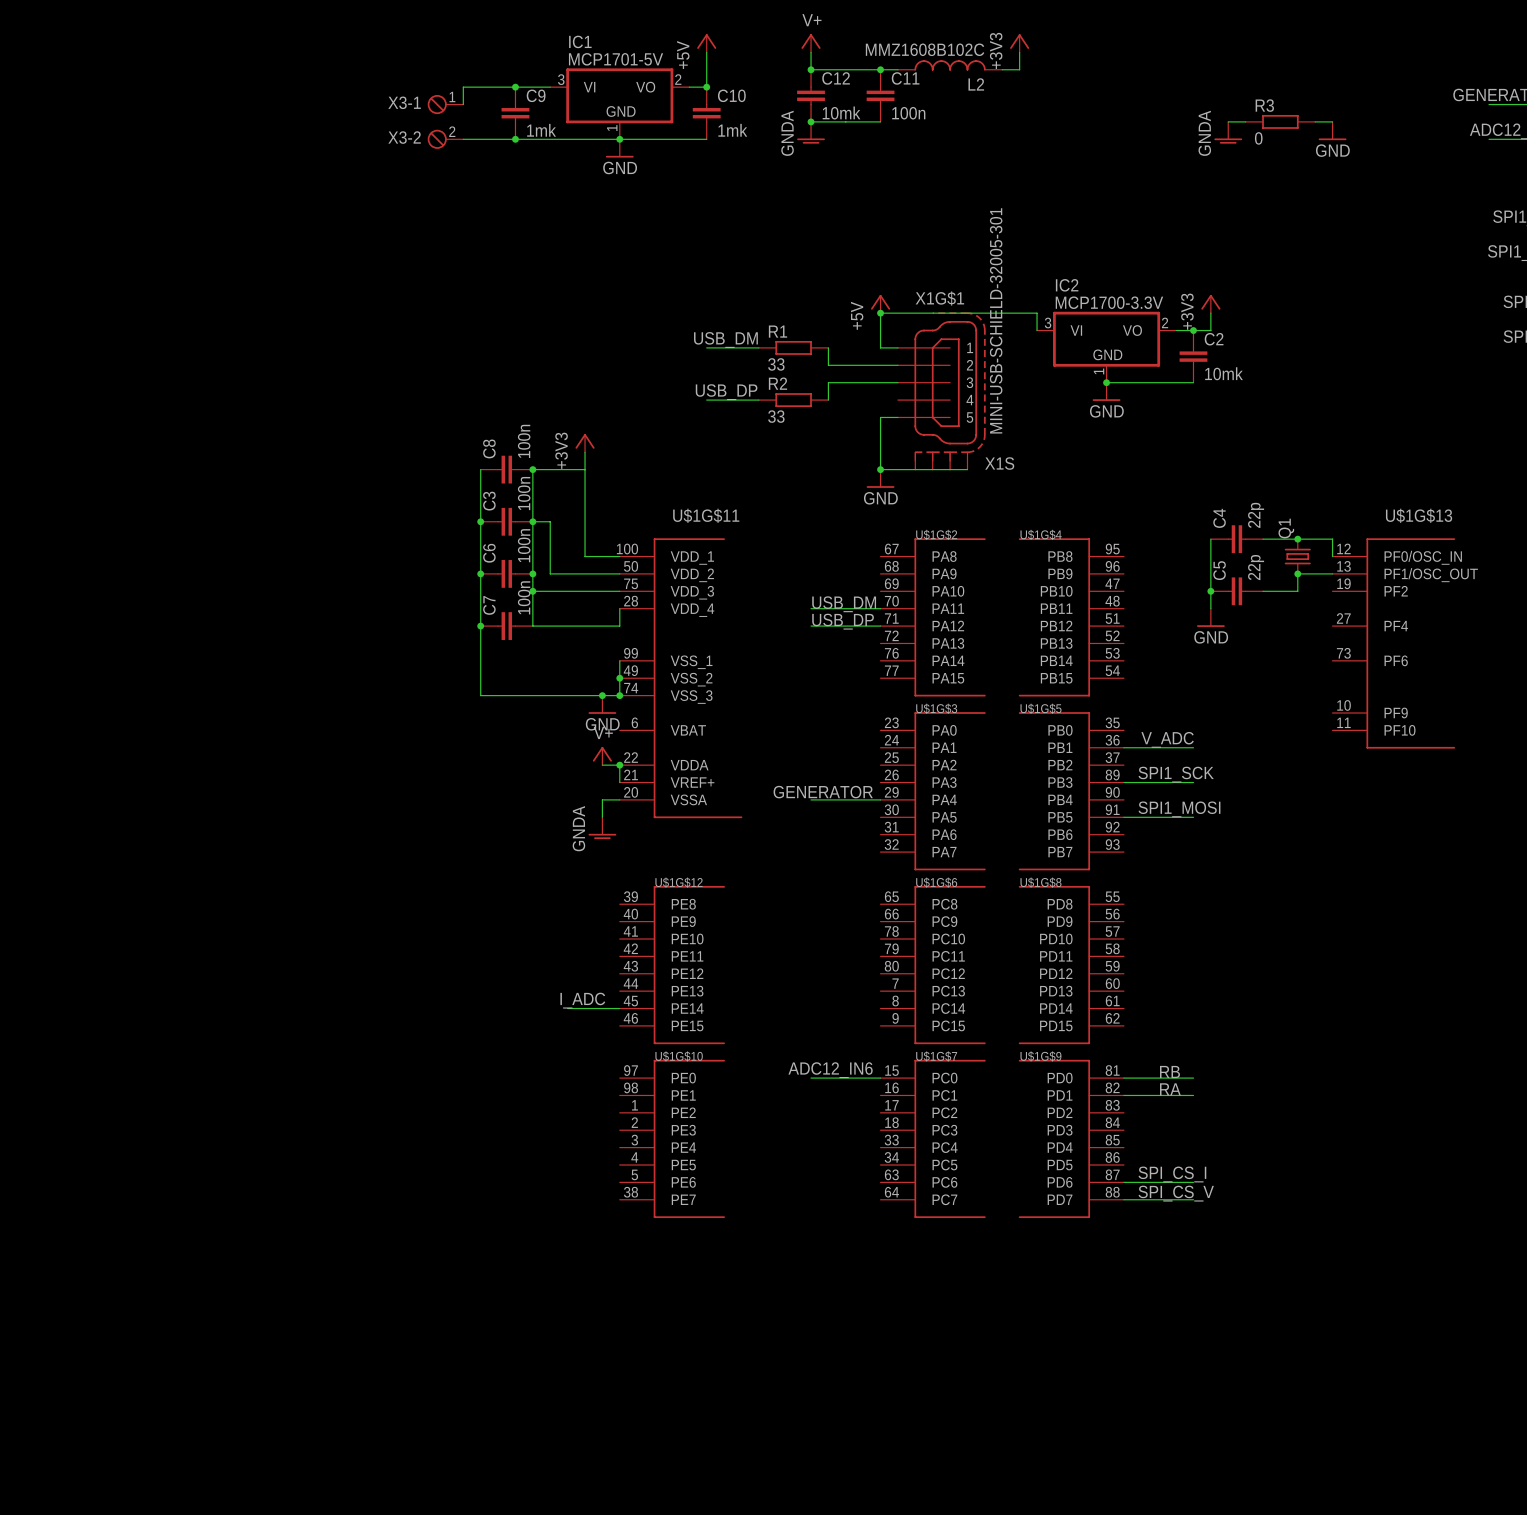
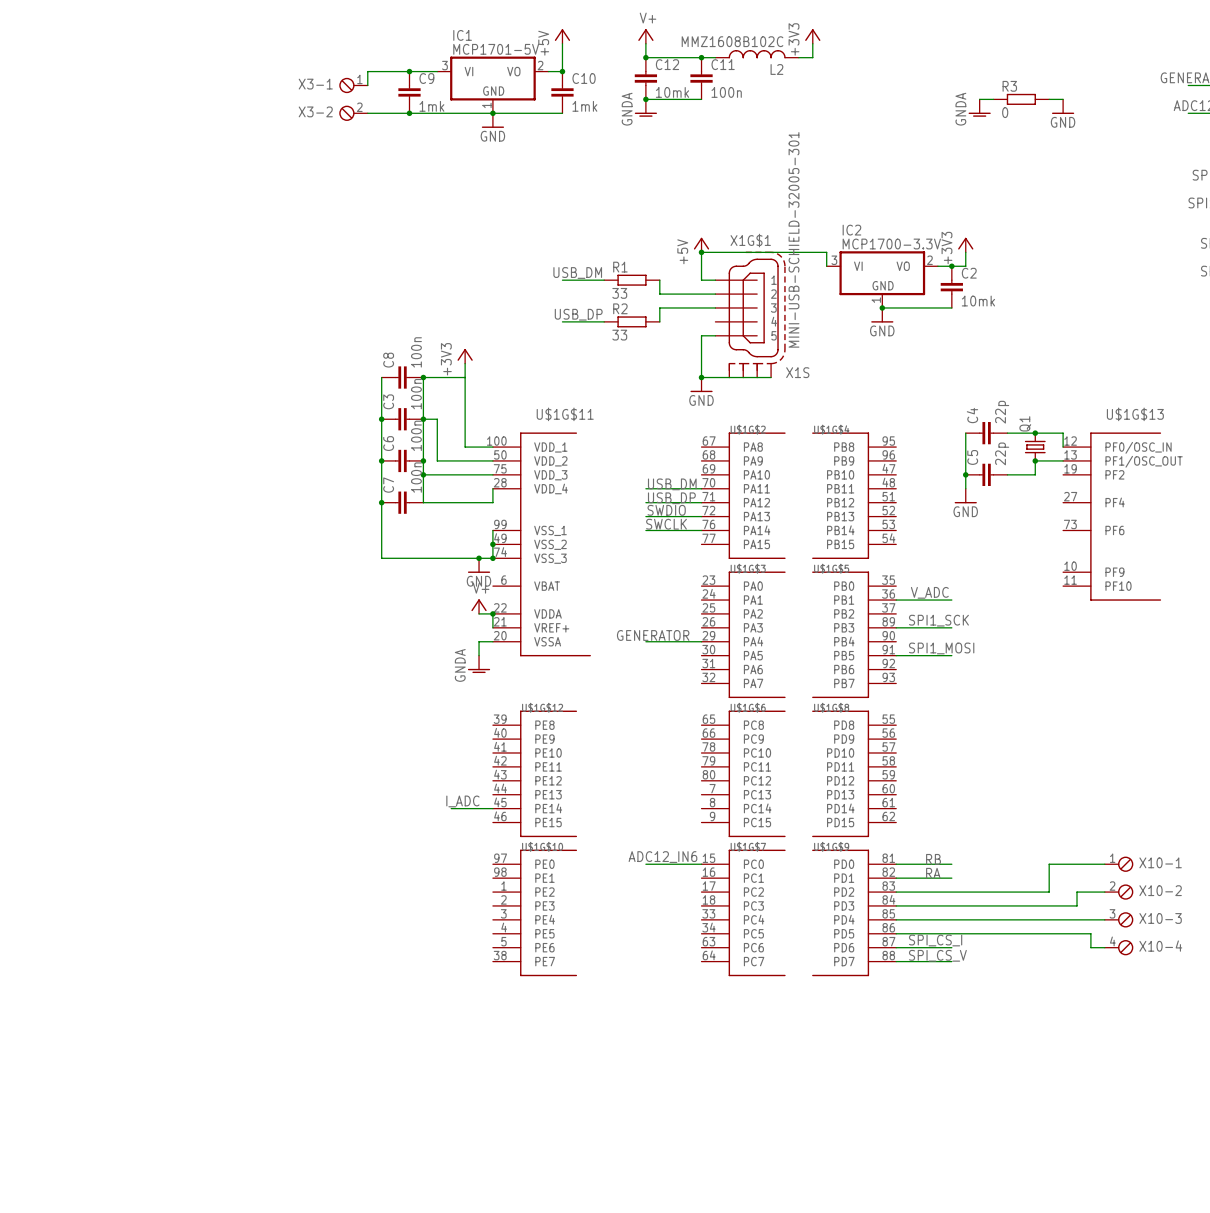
label: none -> SWDIO (666, 510)
wire: none -> (645, 516) (701, 516)
label: none -> SWCLK (666, 524)
wire: none -> (645, 530) (701, 530)
wire: none -> (1104, 864) (1049, 864) (1049, 892) (896, 892)
X10-1: none -> (1119, 864)
wire: none -> (1104, 892) (1077, 892) (1077, 905) (896, 905)
X10-2: none -> (1119, 892)
wire: none -> (896, 919) (1104, 919)
X10-3: none -> (1119, 919)
wire: none -> (896, 933) (1090, 933) (1090, 947) (1104, 947)
X10-4: none -> (1119, 947)

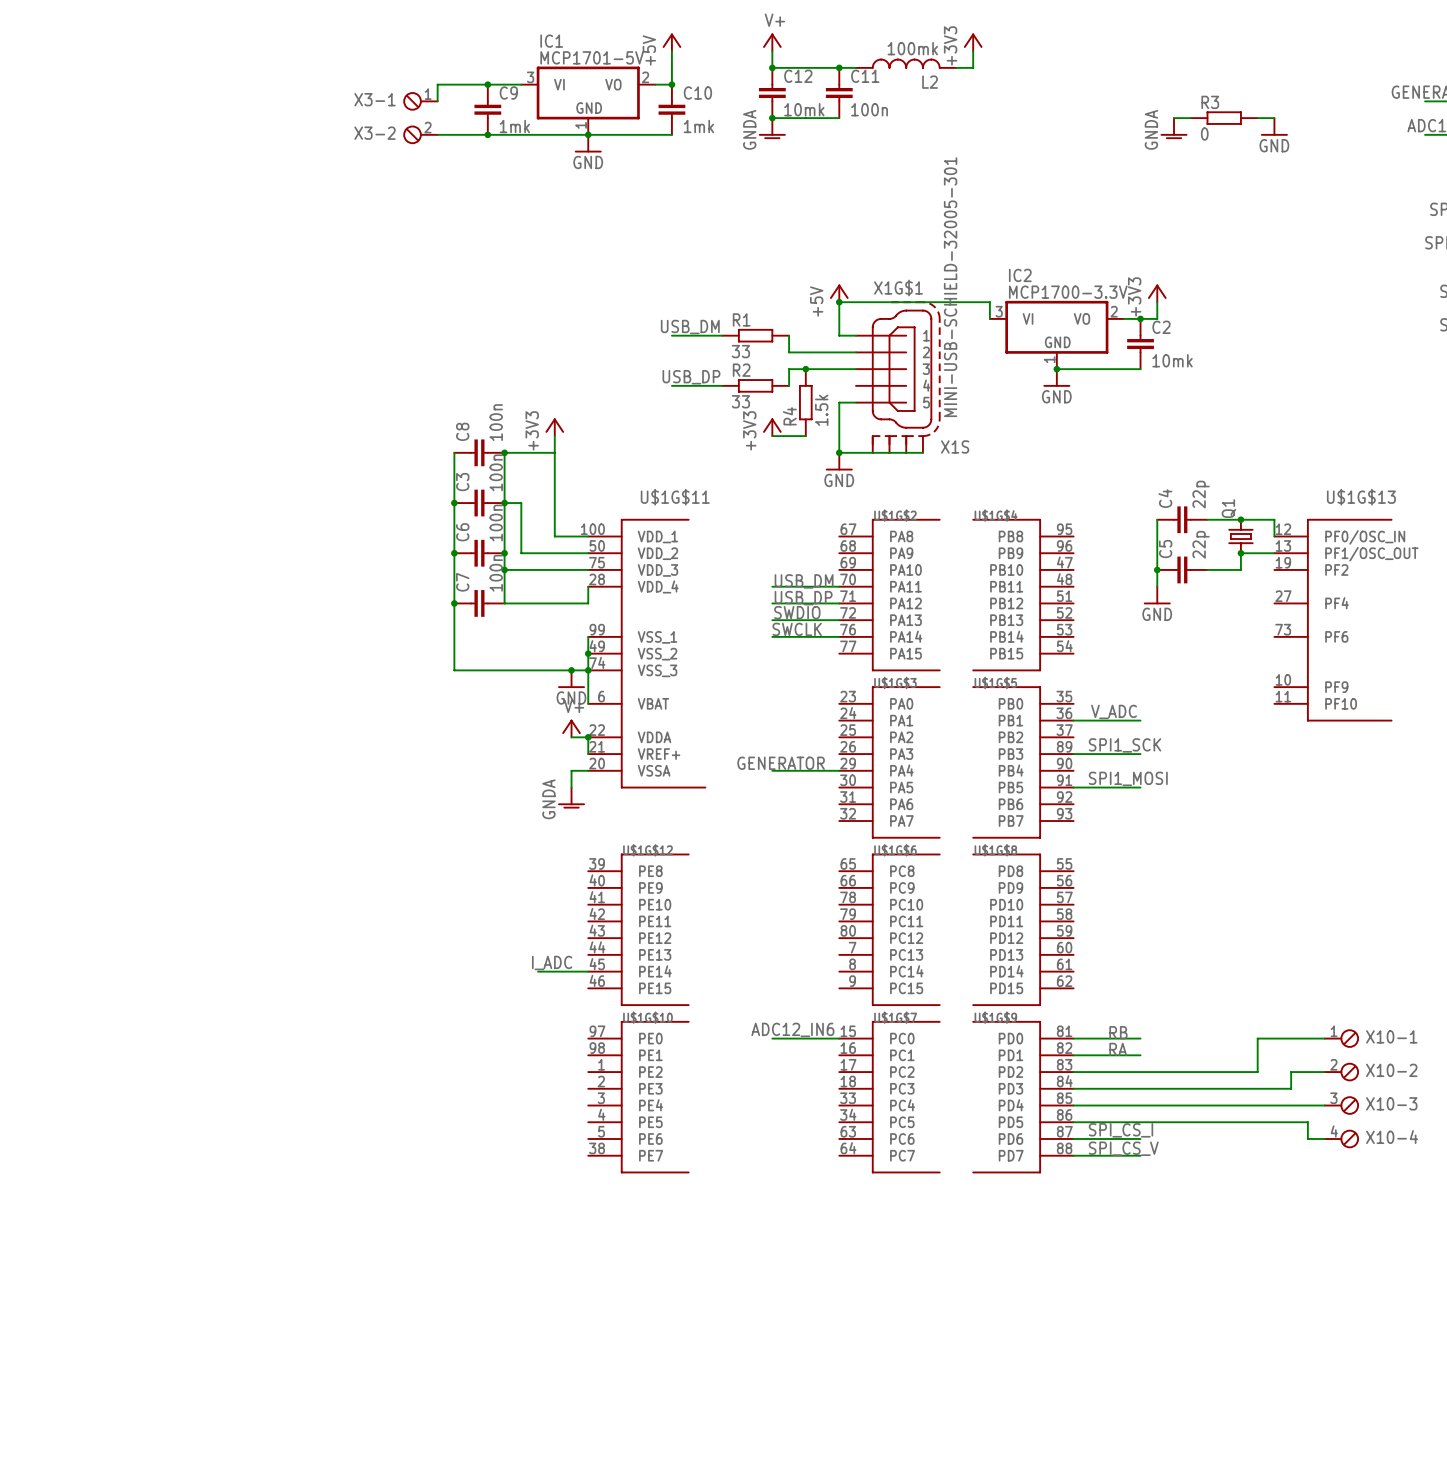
L2 value: MMZ1608B102C (732, 41) -> 100mk (912, 48)
junction: none -> (805, 369)
R4: none -> 1.5k (805, 402)
power symbol: none -> +3V3 (772, 427)
wire: none -> (772, 436) (805, 436)
wire: none -> (588, 670) (588, 703)

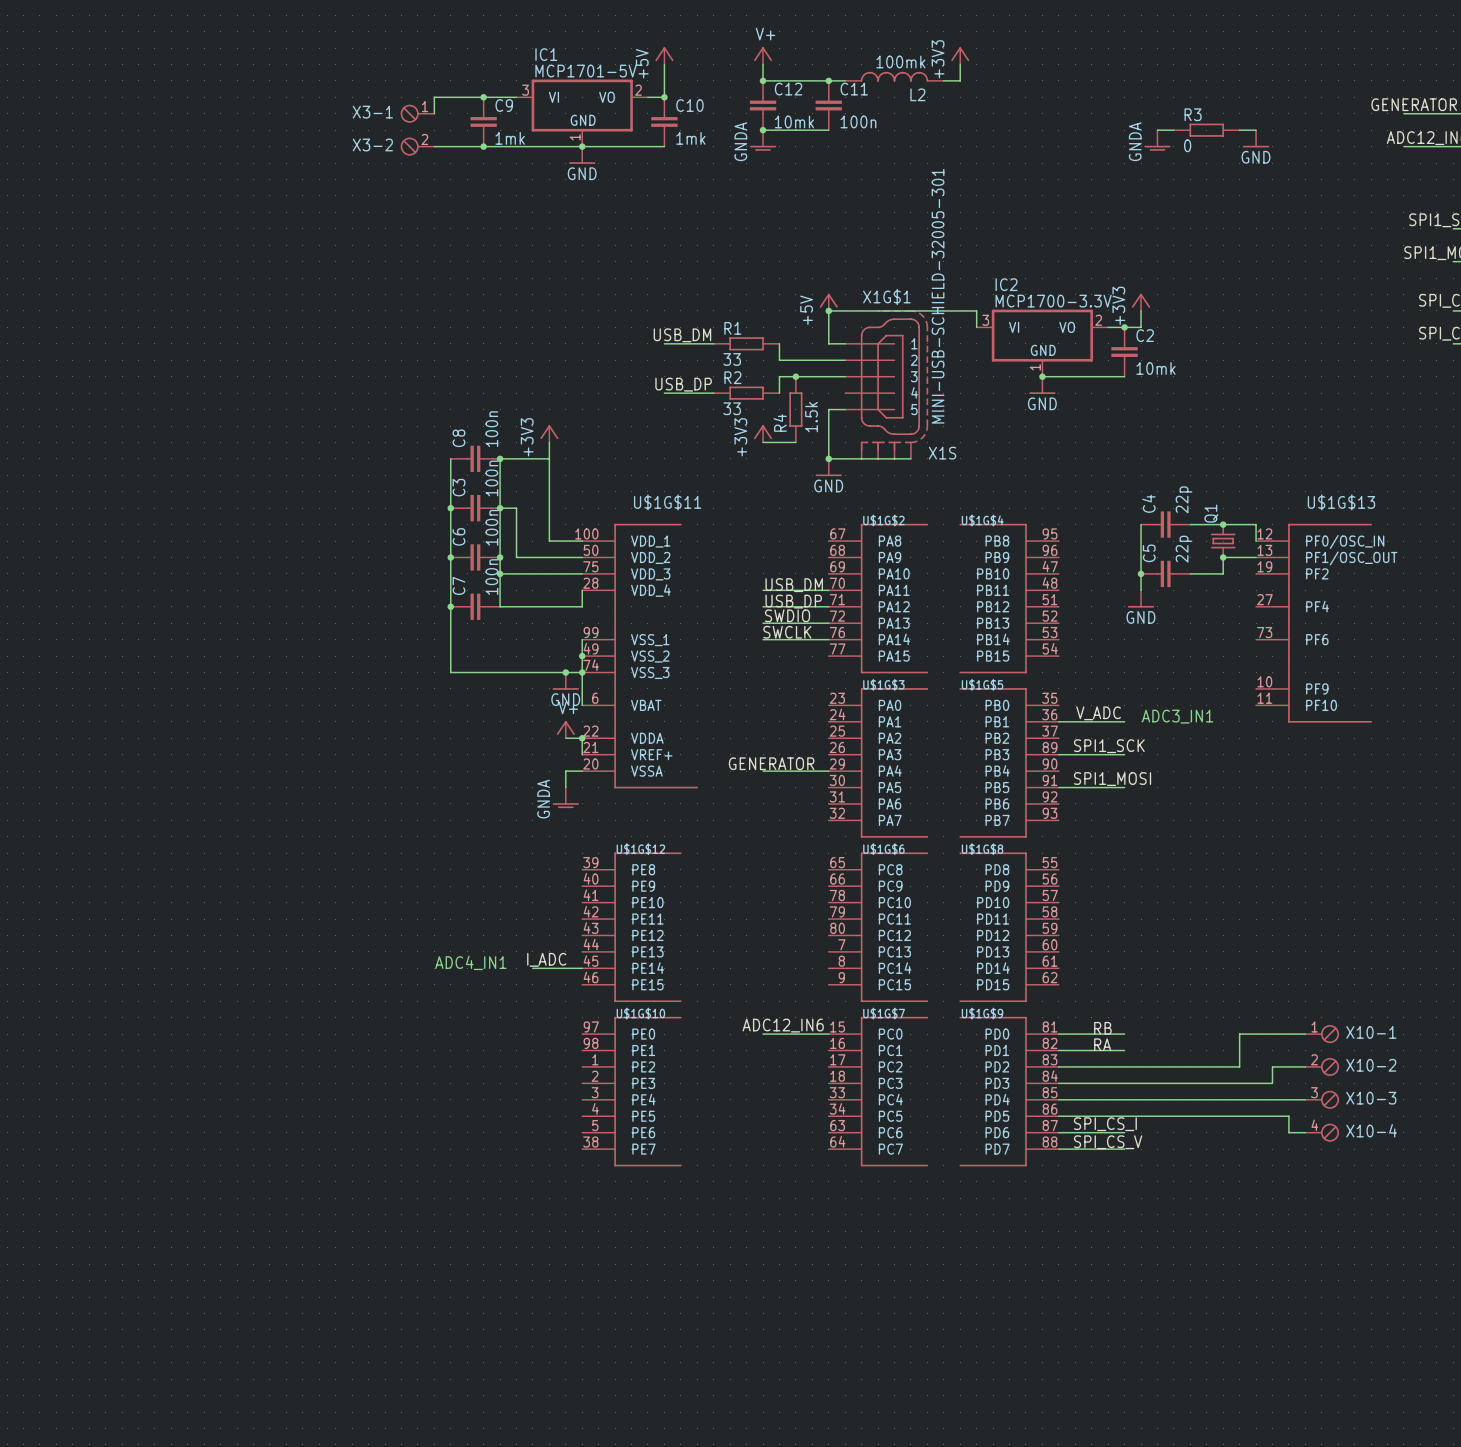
text: none -> ADC3_IN1 (1177, 716)
text: none -> ADC4_IN1 (470, 962)

